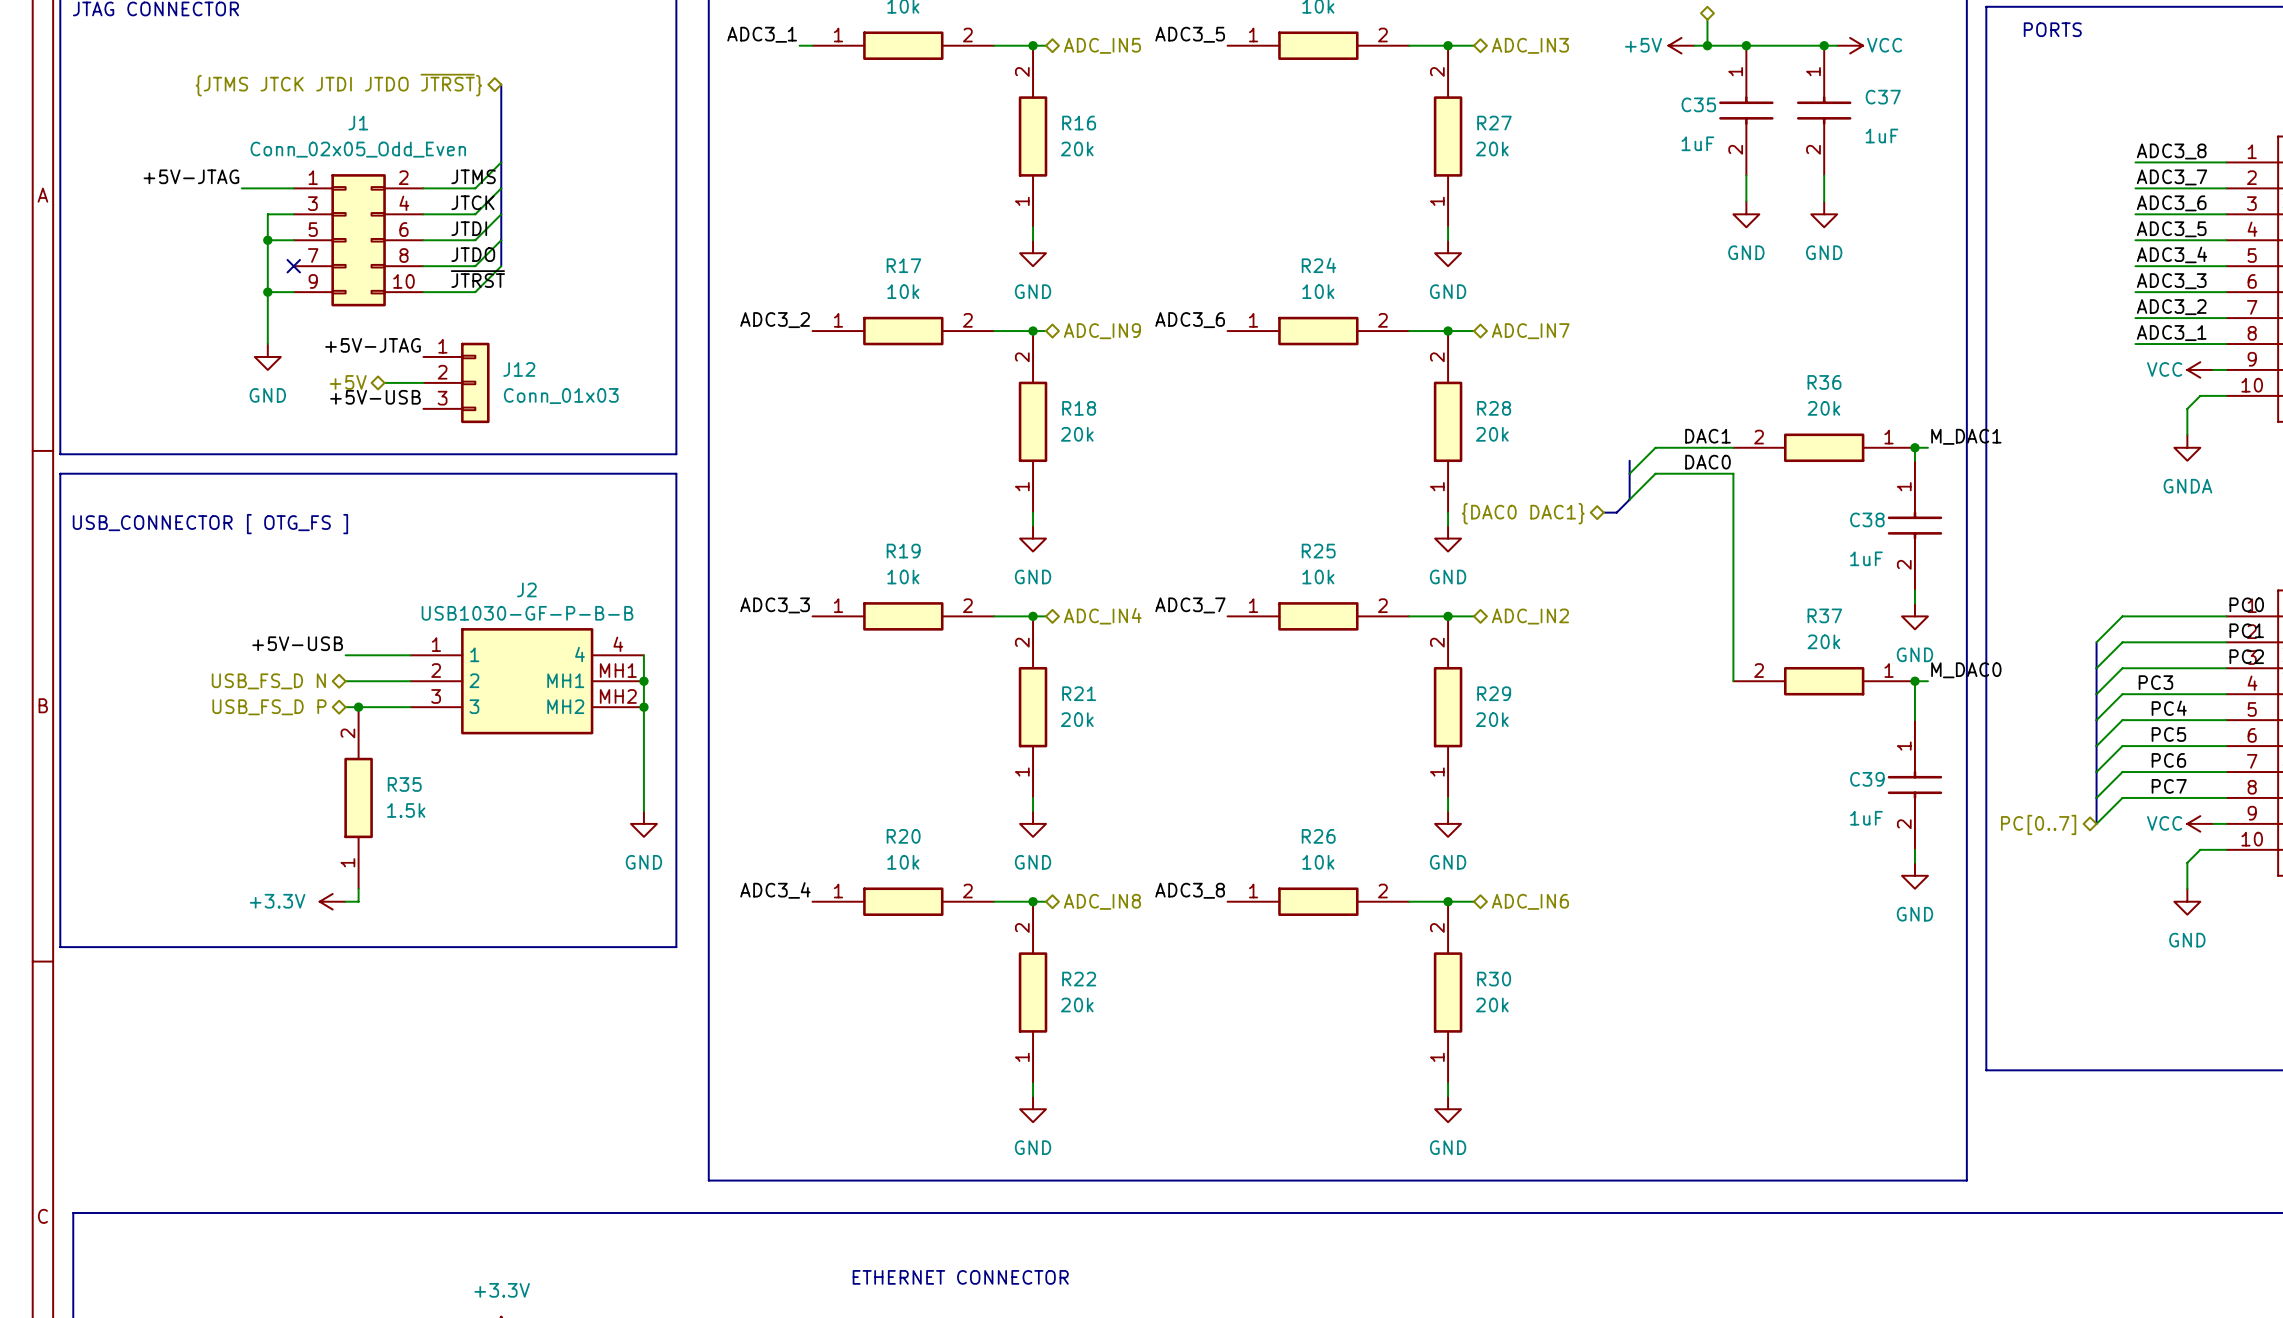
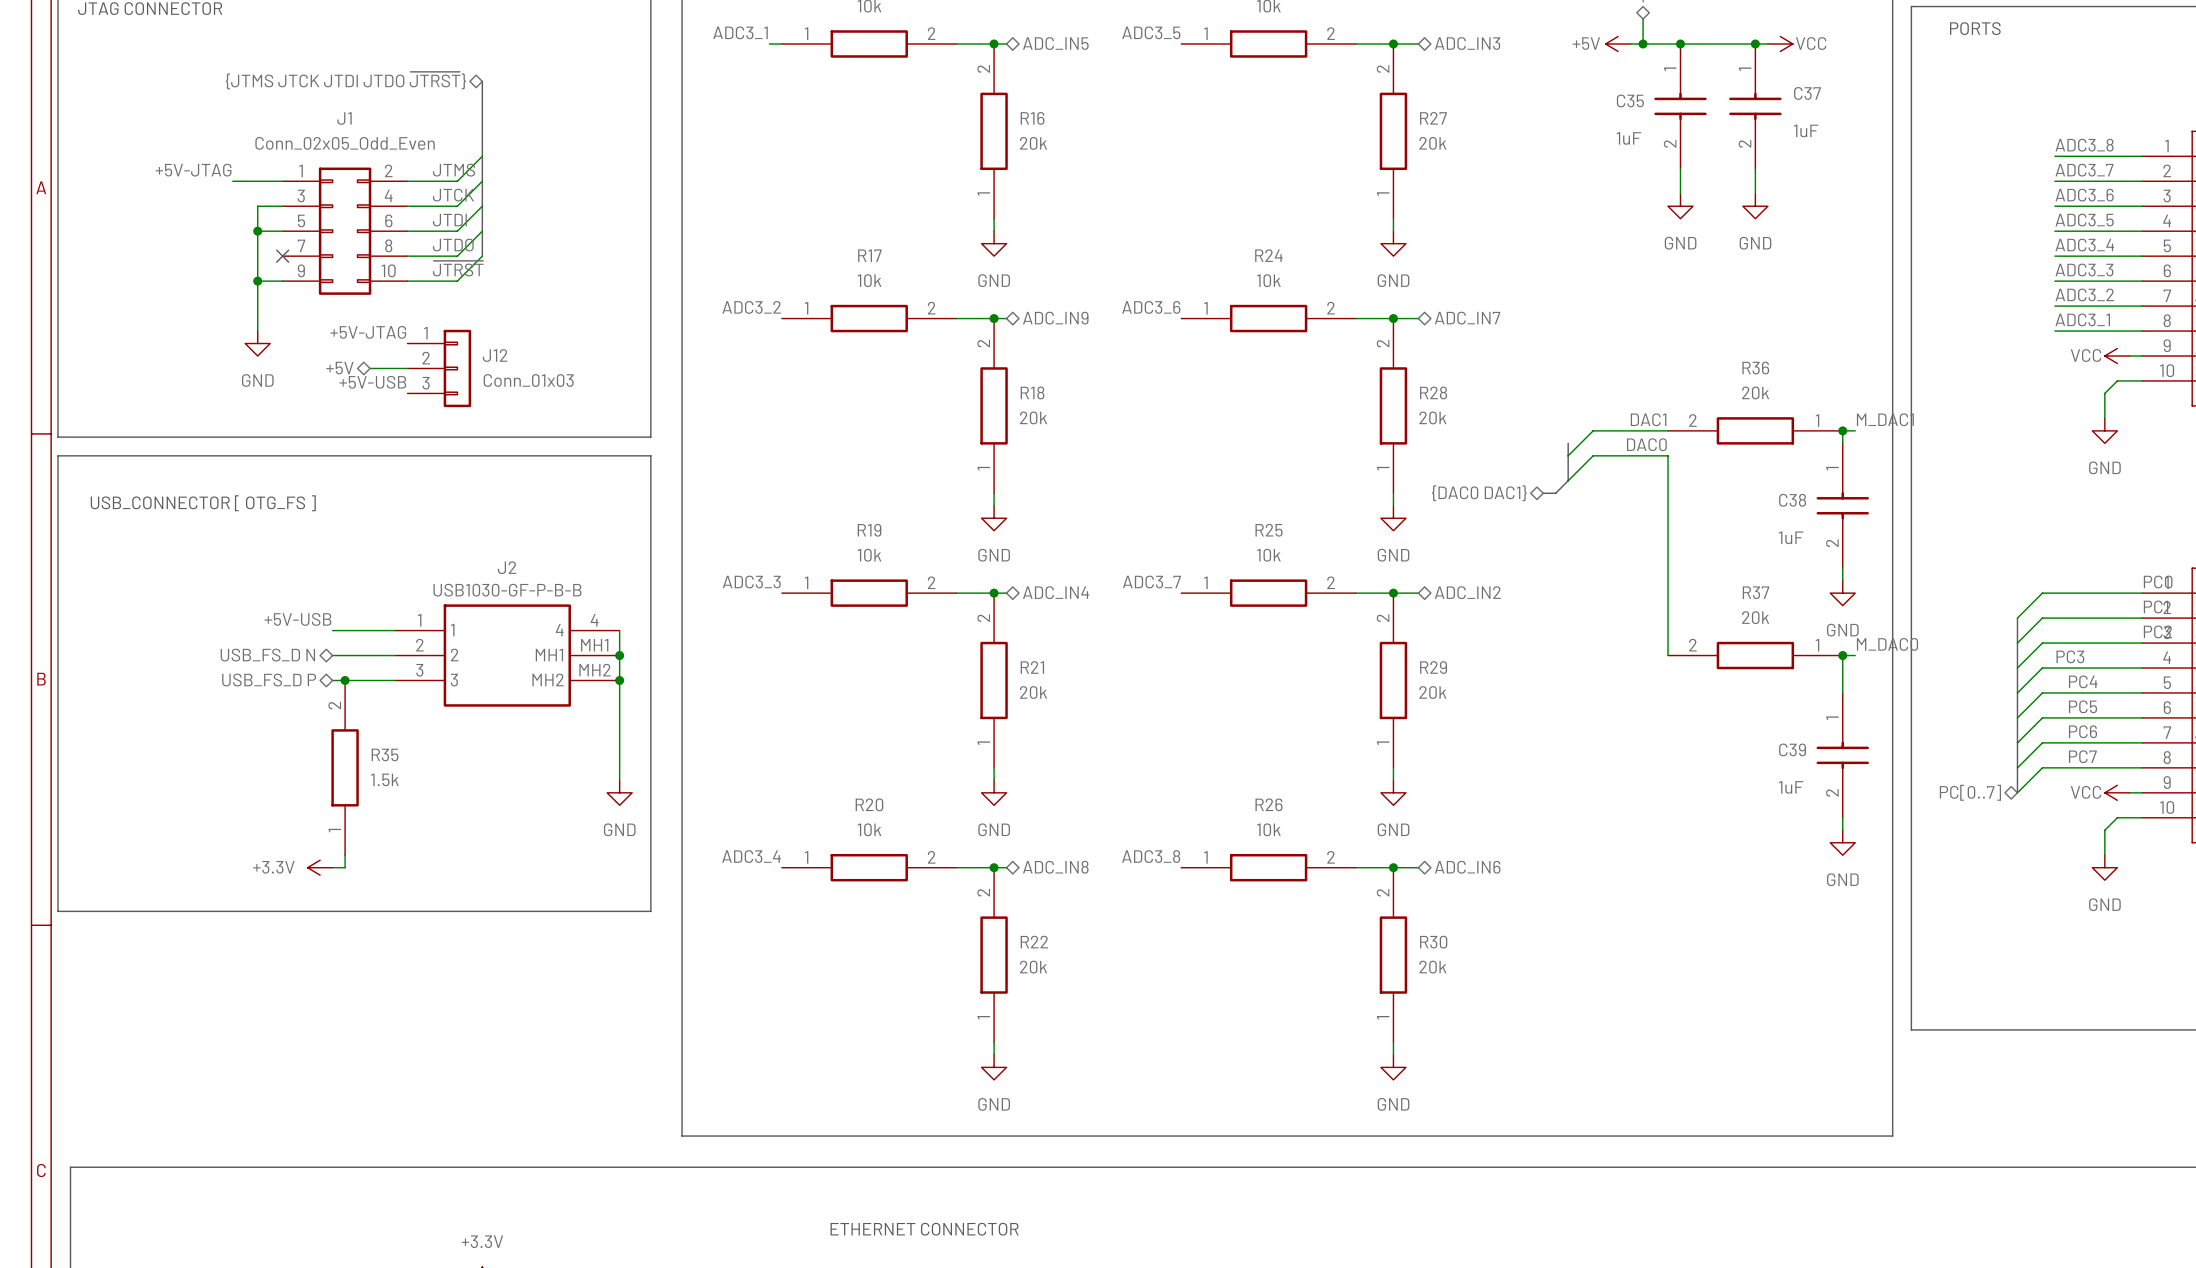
power symbol: GNDA (2187, 447) -> GND (2104, 430)

